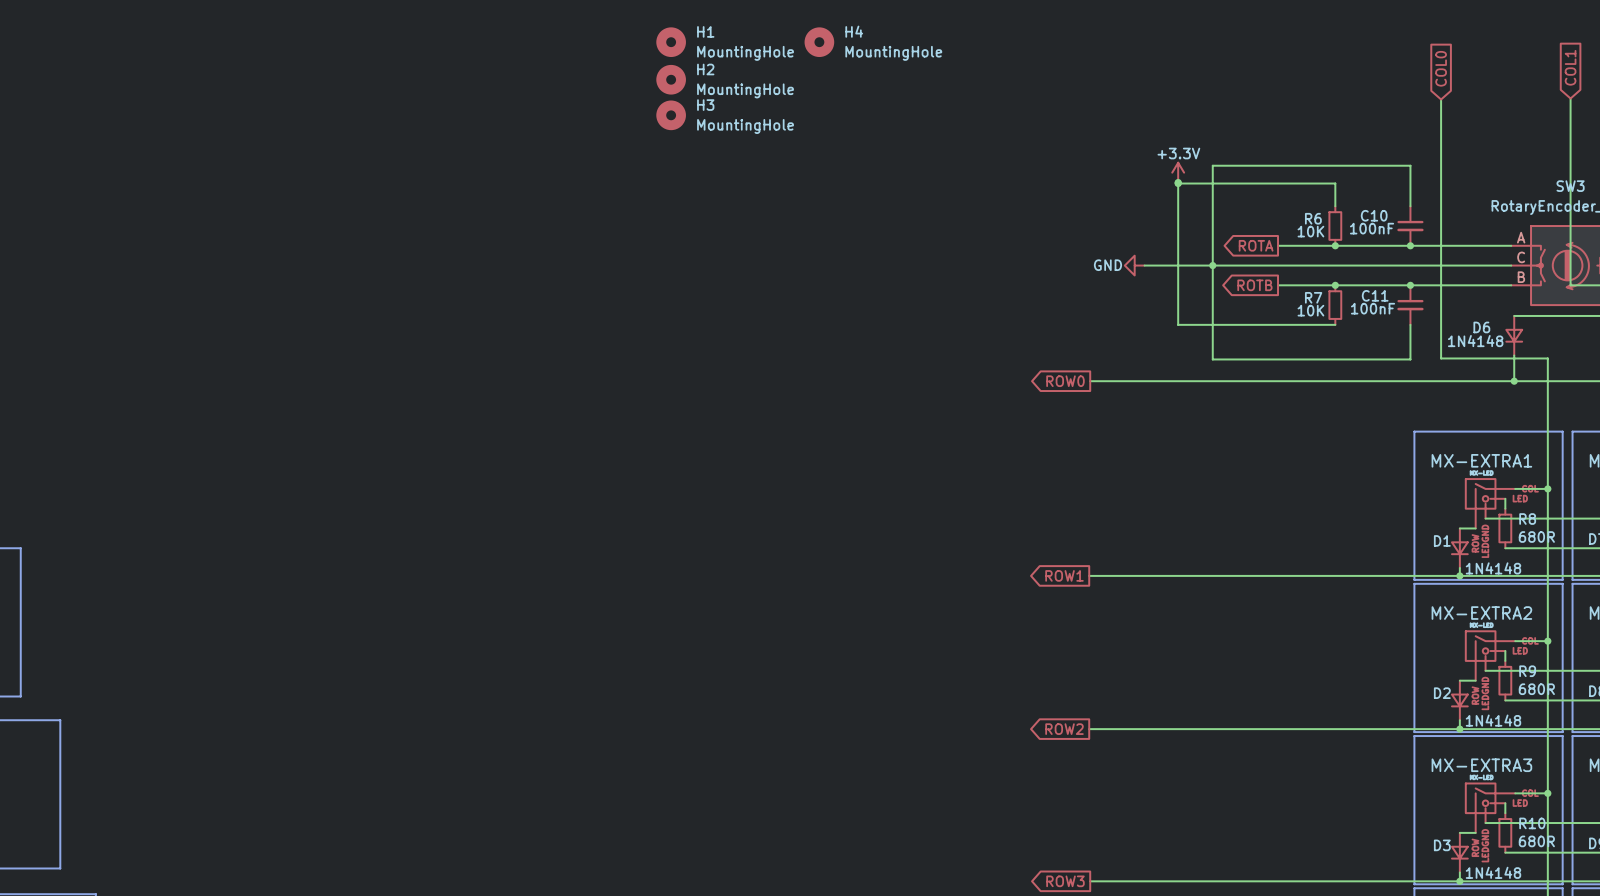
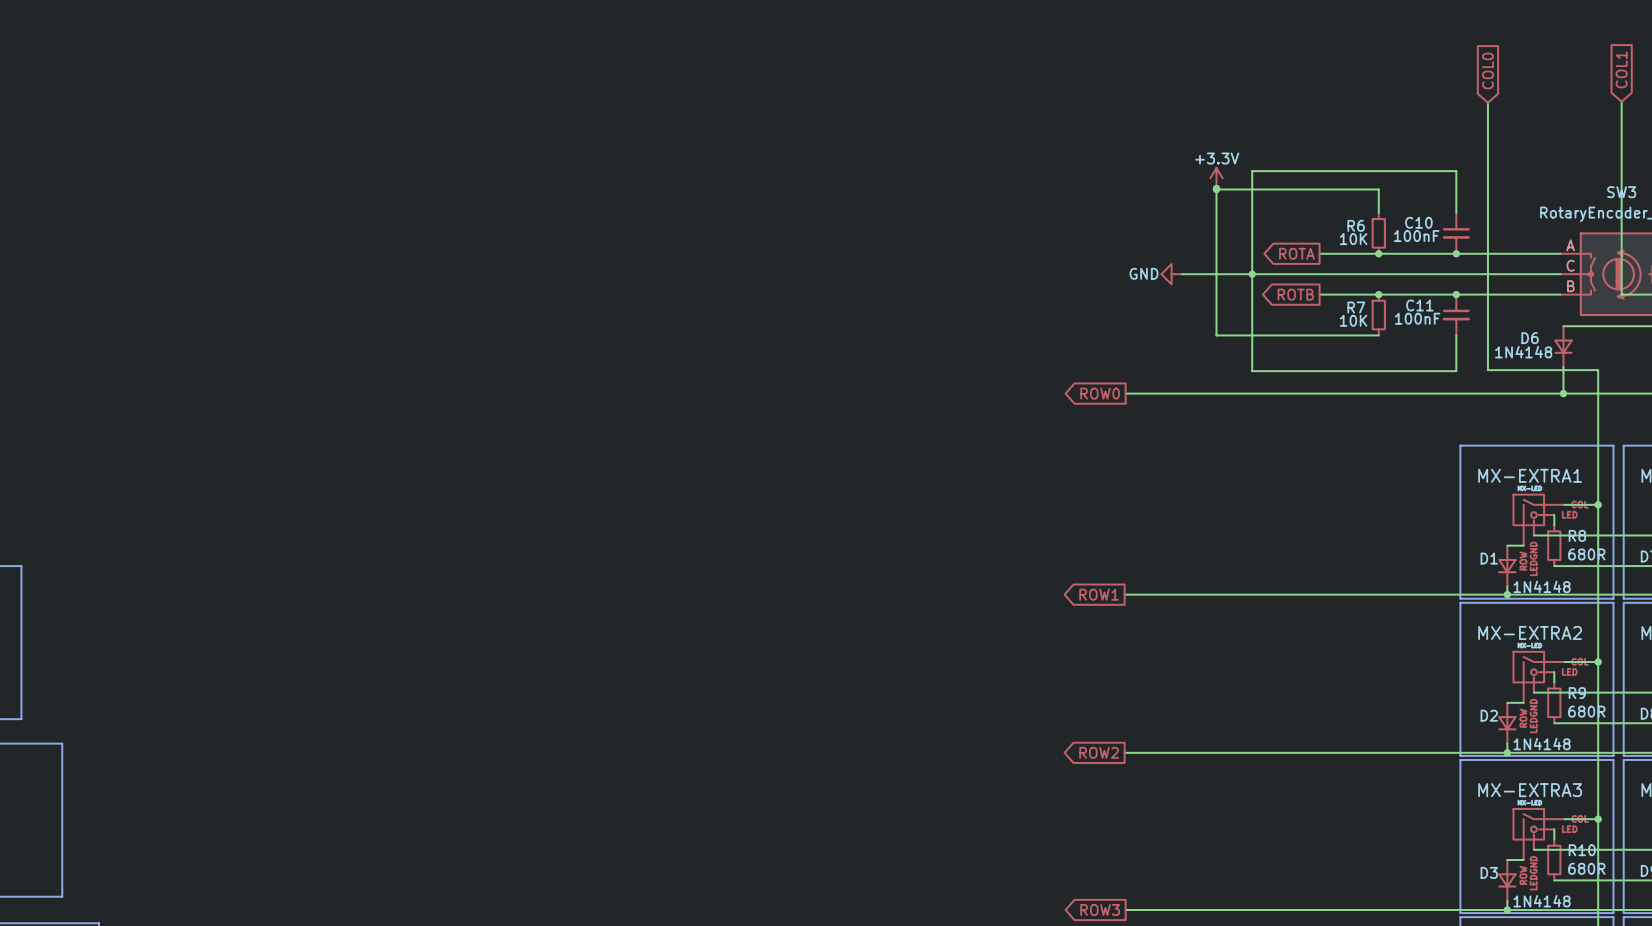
H1: MountingHole (671, 42) -> none
H4: MountingHole (819, 42) -> none
H2: MountingHole (671, 79) -> none
H3: MountingHole (671, 115) -> none

